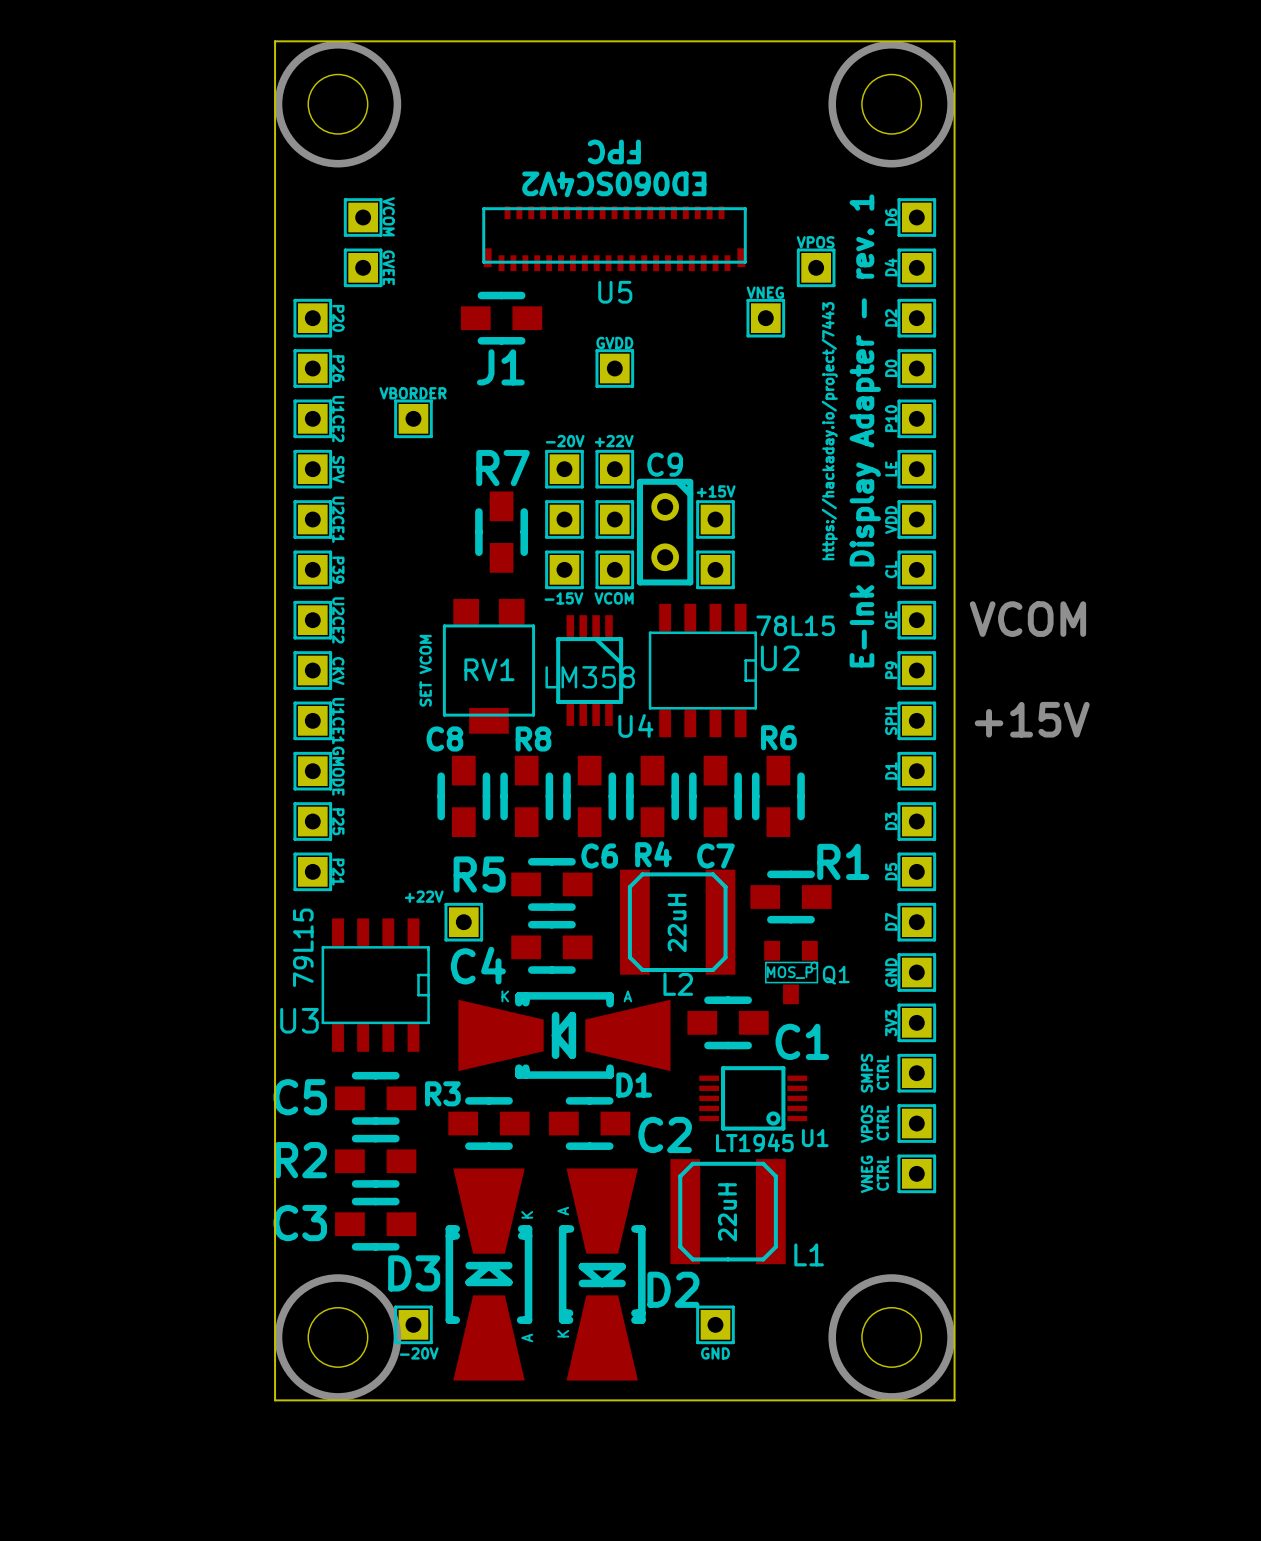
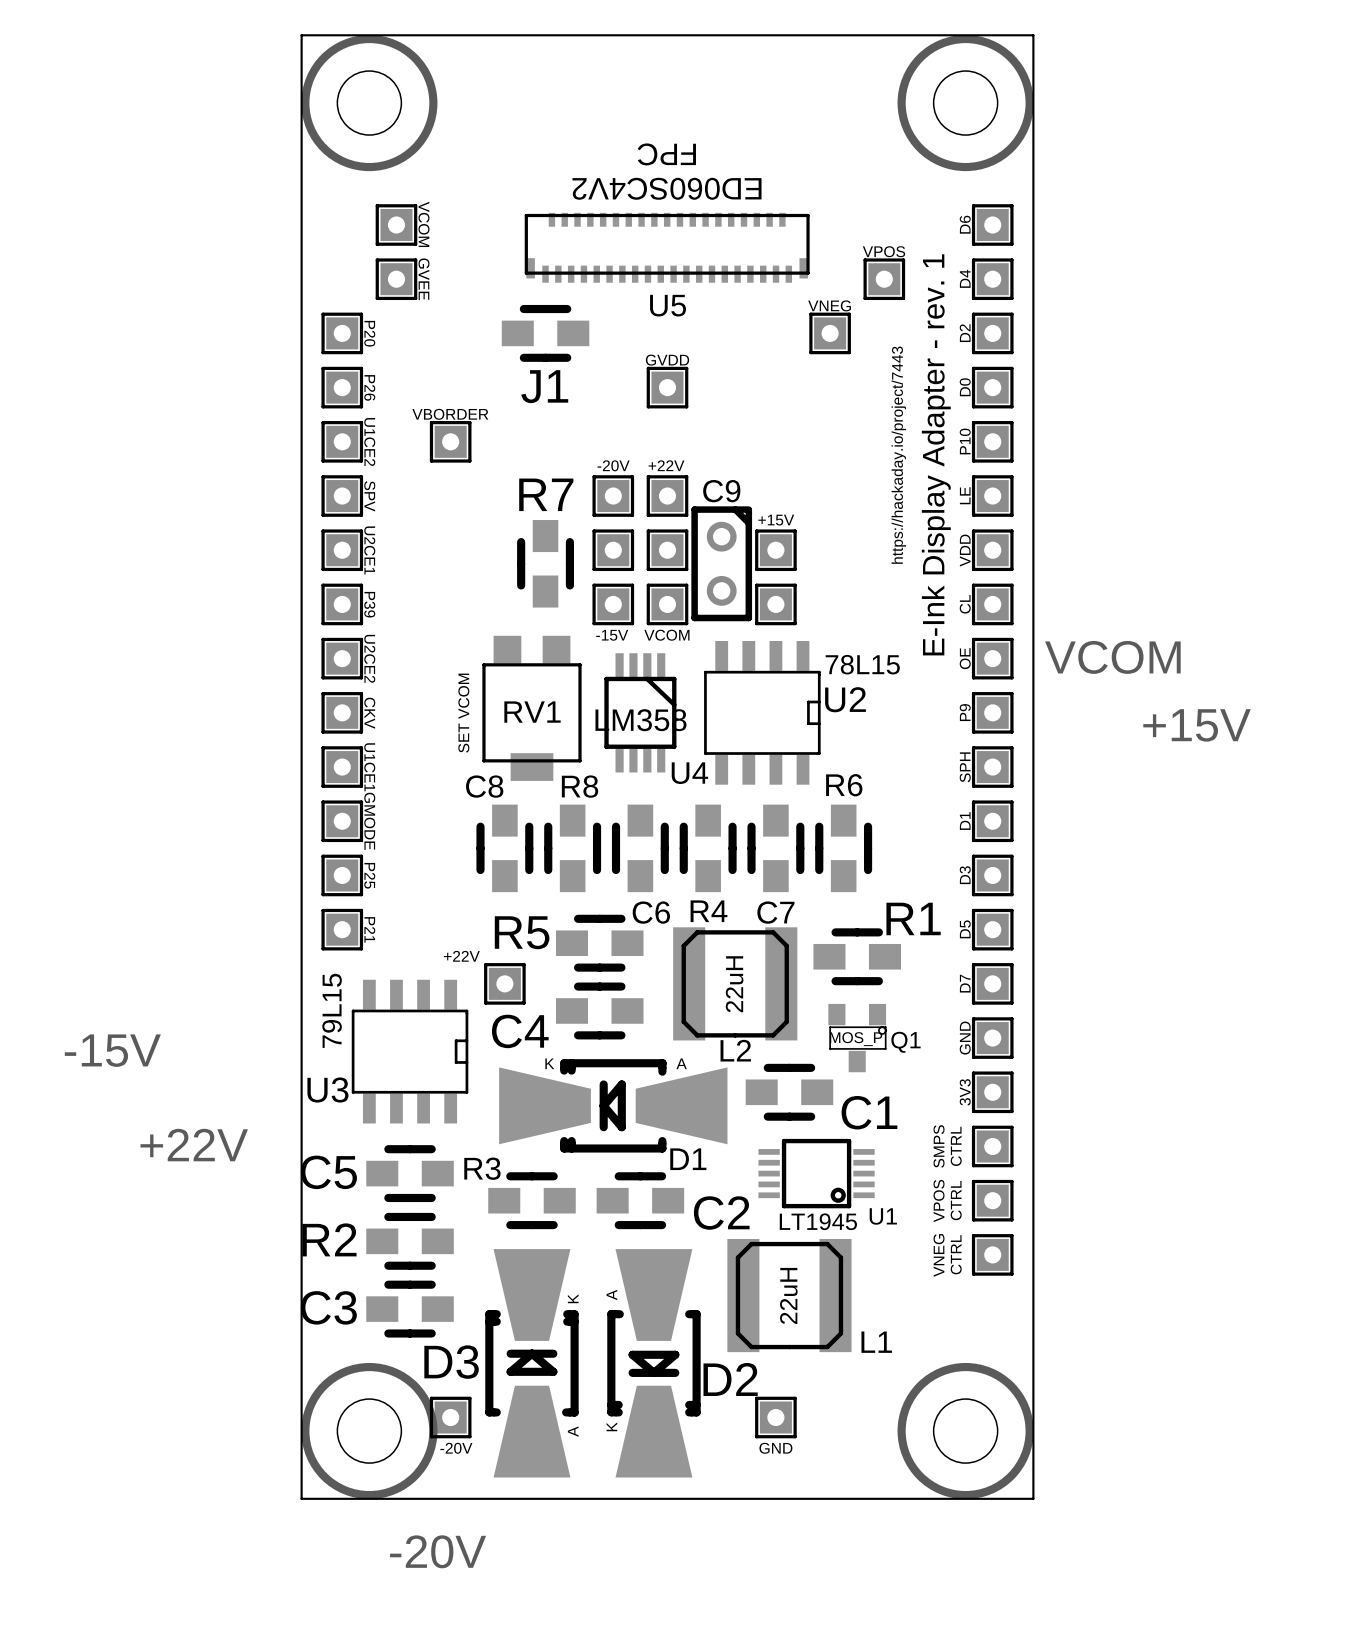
text position: +15V (1032, 719) -> +15V (1197, 725)
text: none -> -15V (112, 1050)
text: none -> +22V (194, 1145)
text: none -> -20V (438, 1551)

